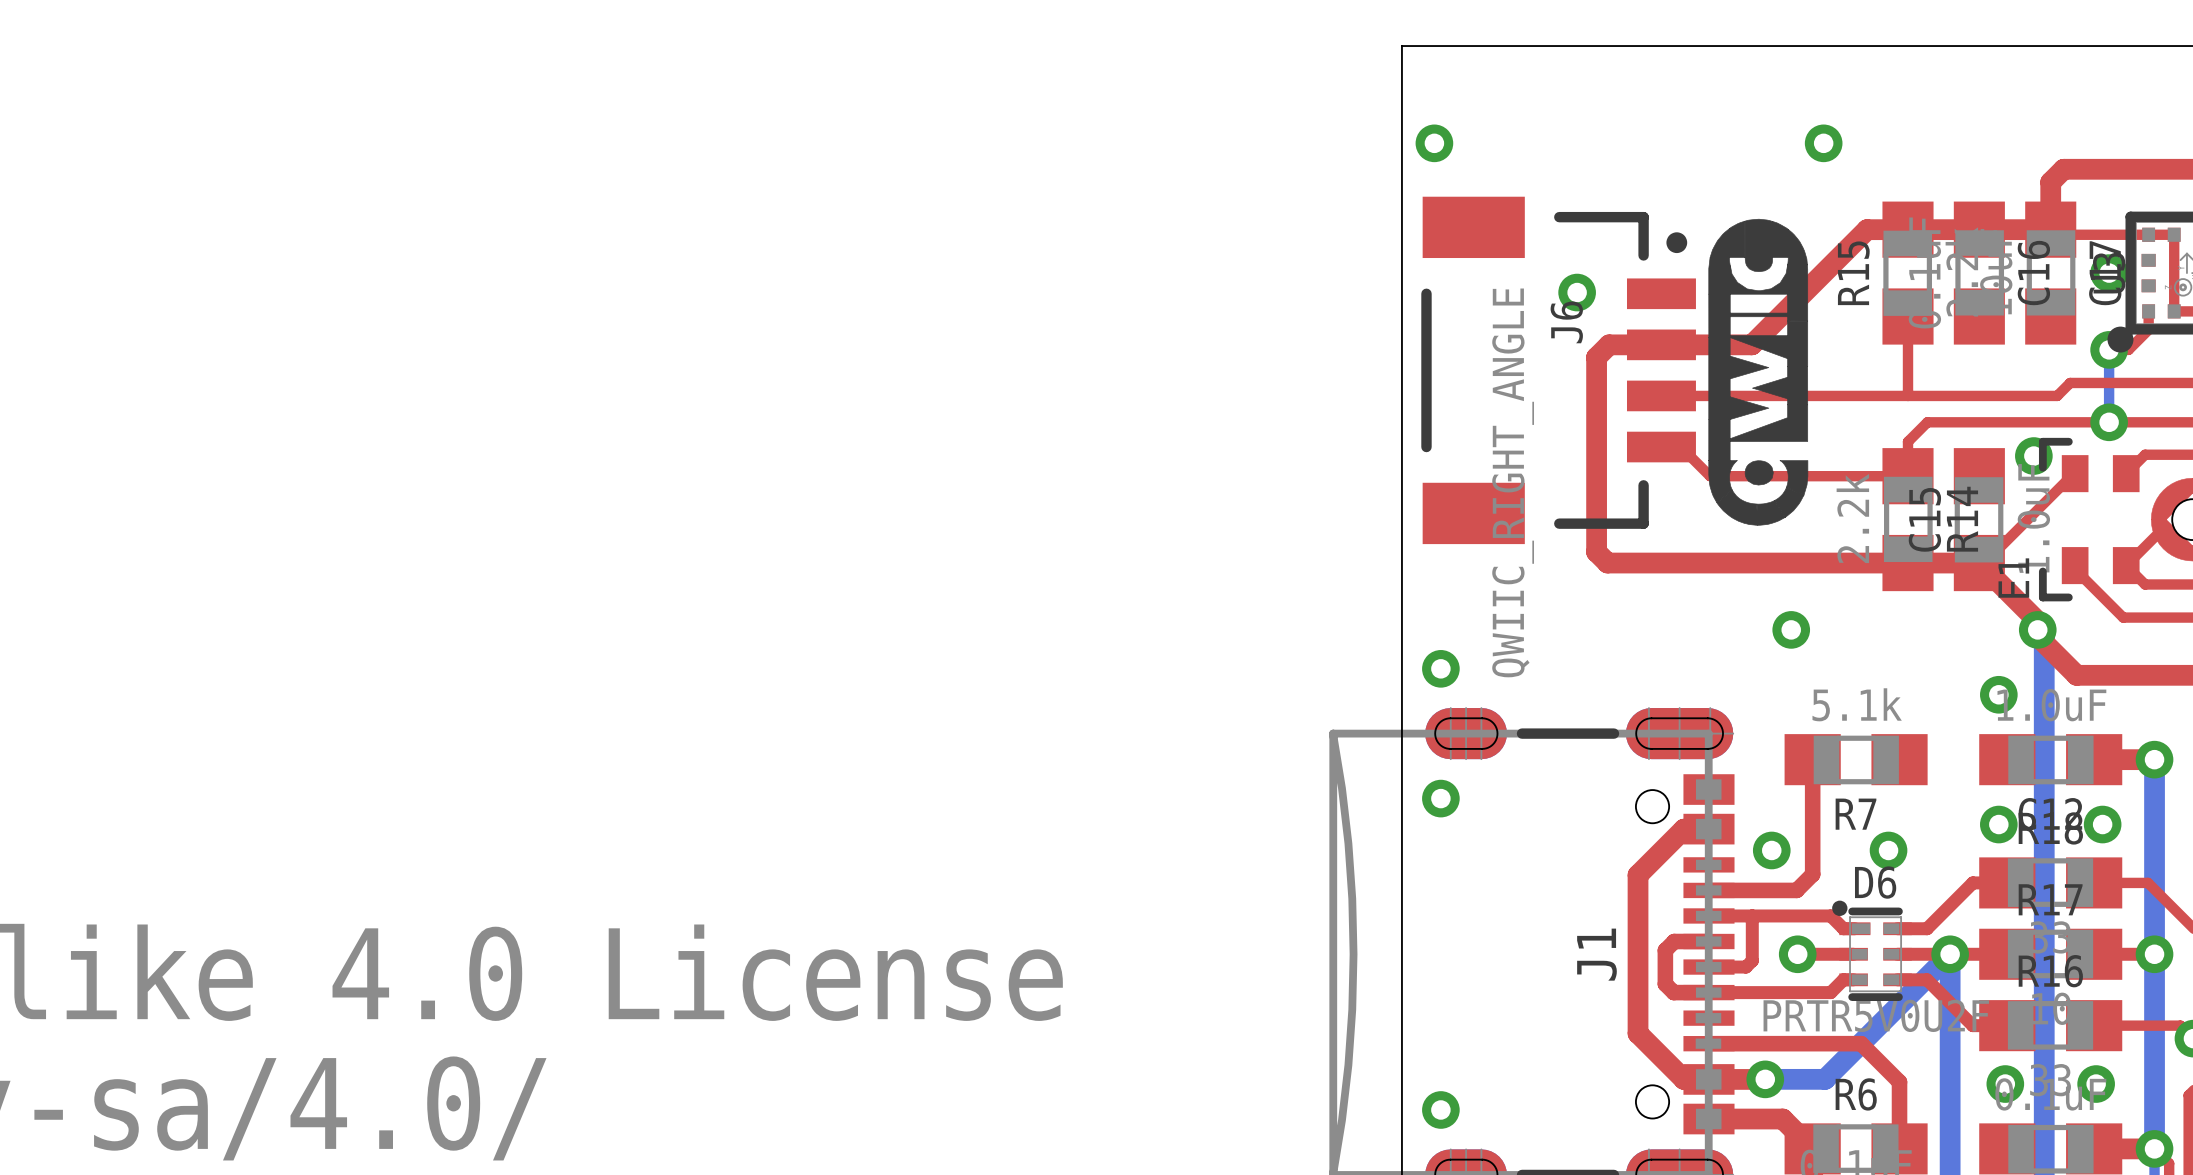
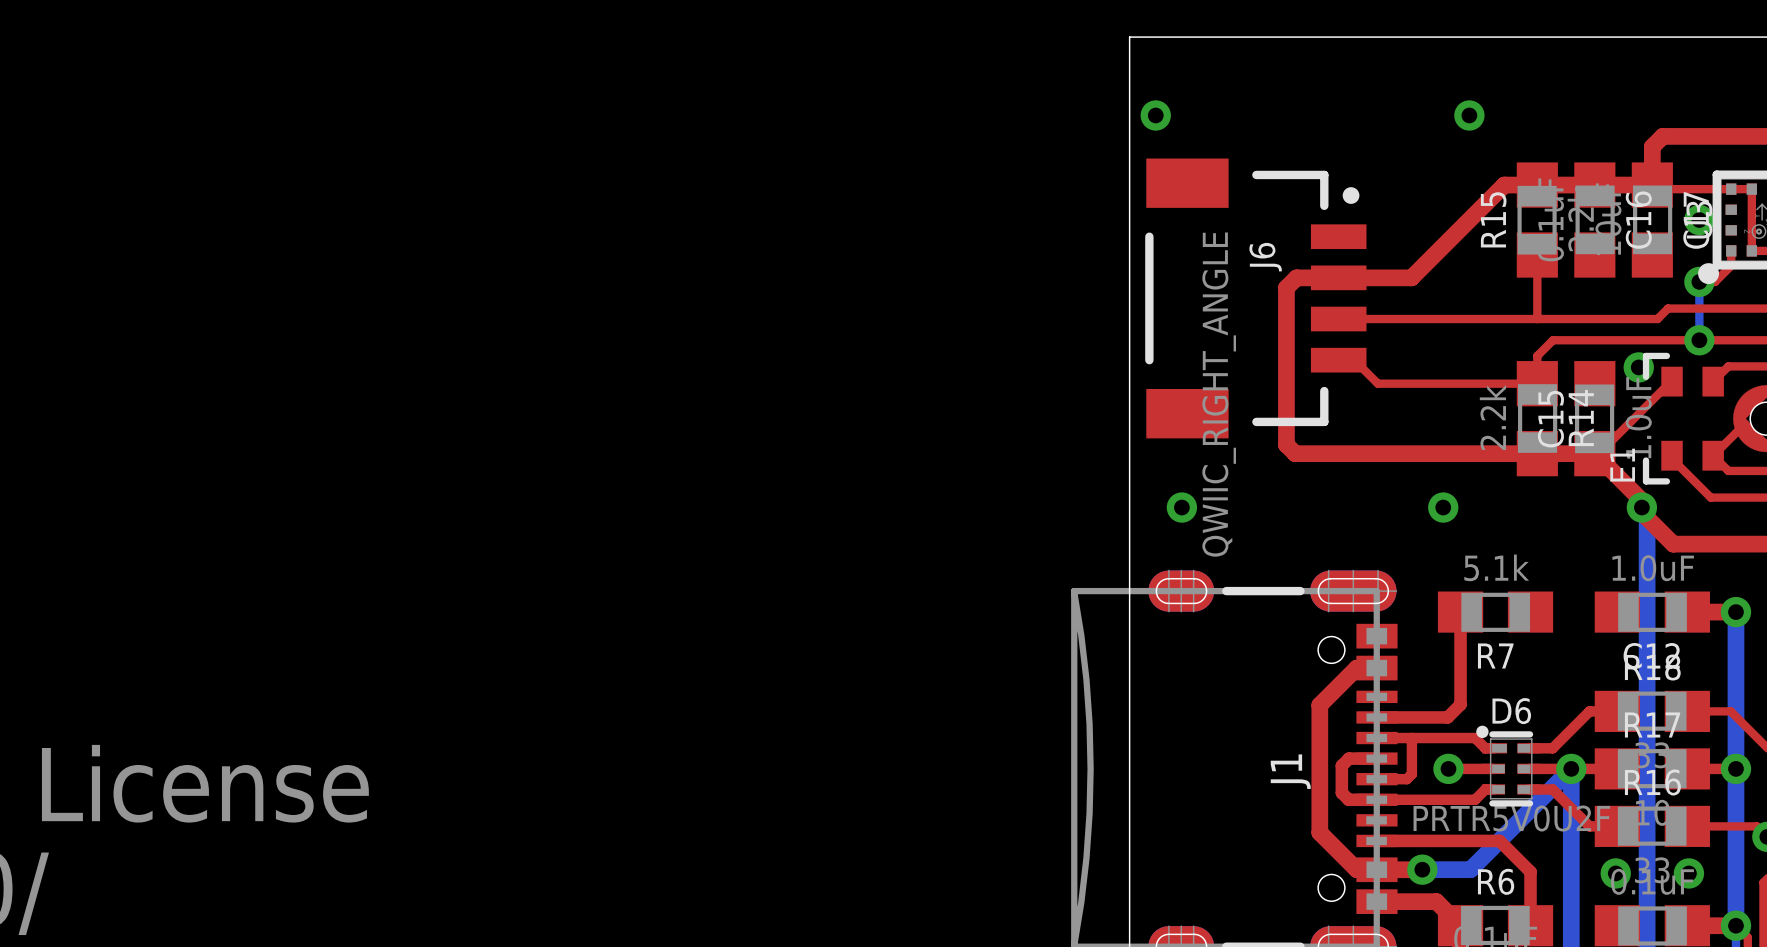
drawing: [1708, 218, 1809, 526] -> none
via: (1577, 292) -> none
via position: (1440, 668) -> (1181, 507)
via: (1998, 694) -> none
via: (1440, 798) -> none
via: (1998, 824) -> none
via: (2102, 824) -> none
via: (1771, 850) -> none
via: (1888, 850) -> none
via: (1440, 1109) -> none

